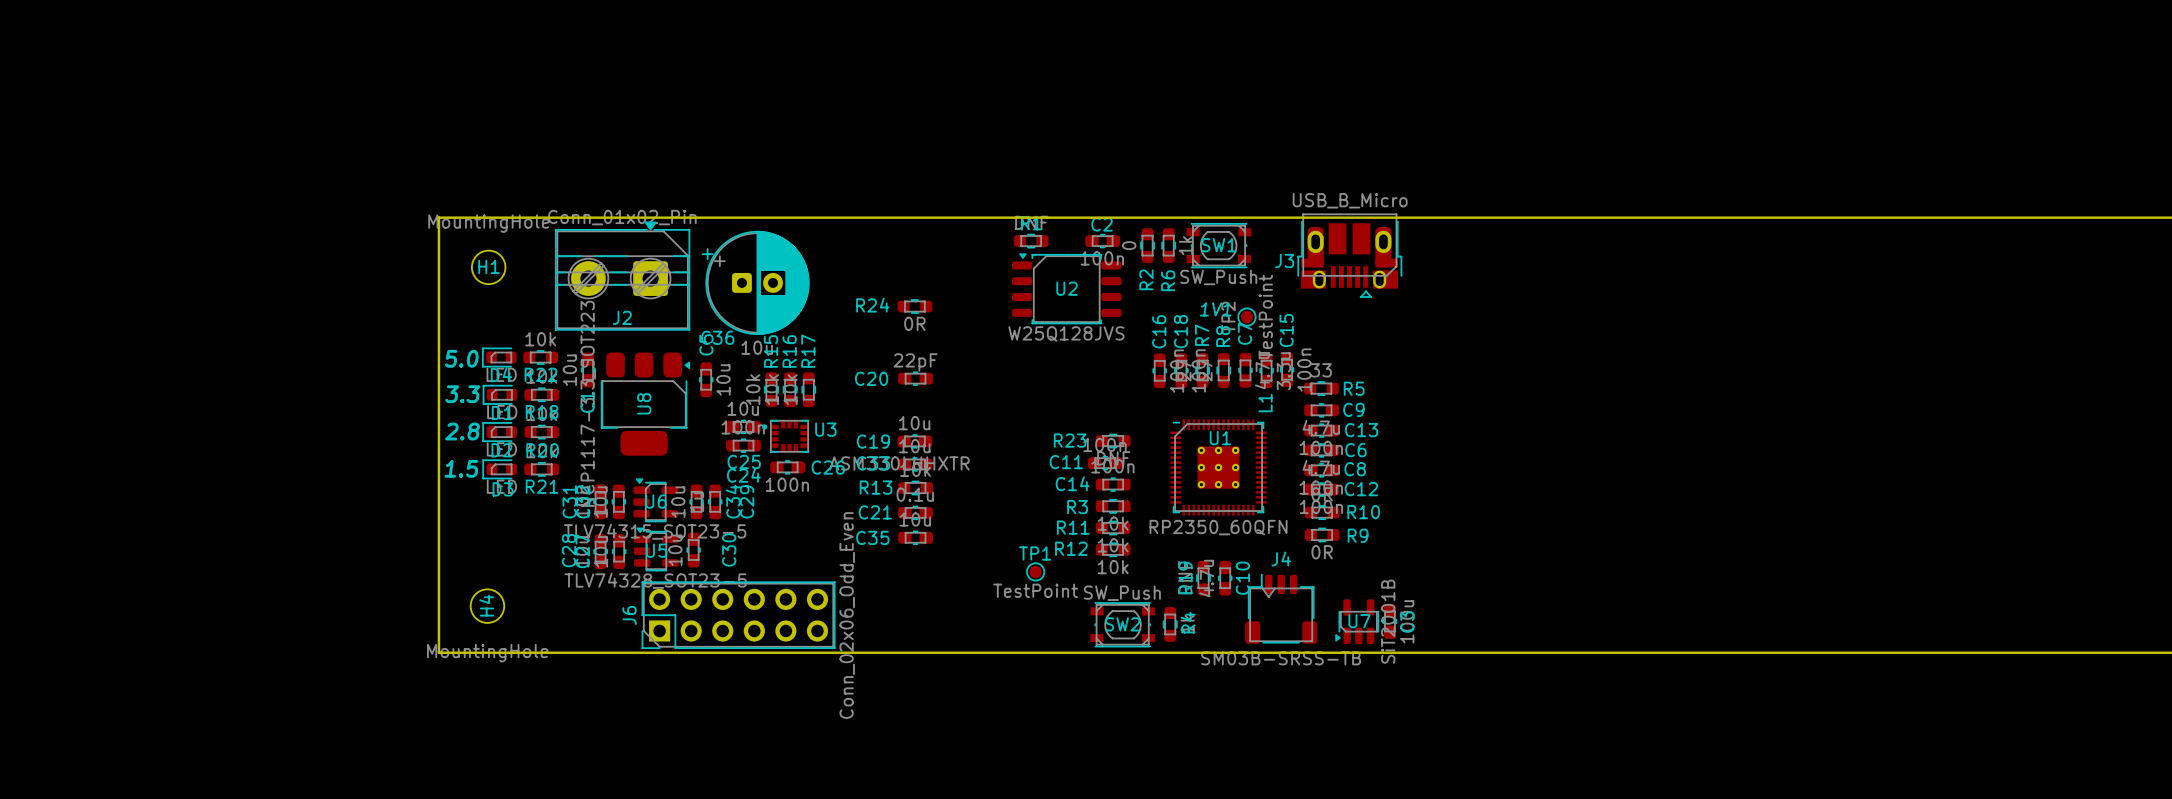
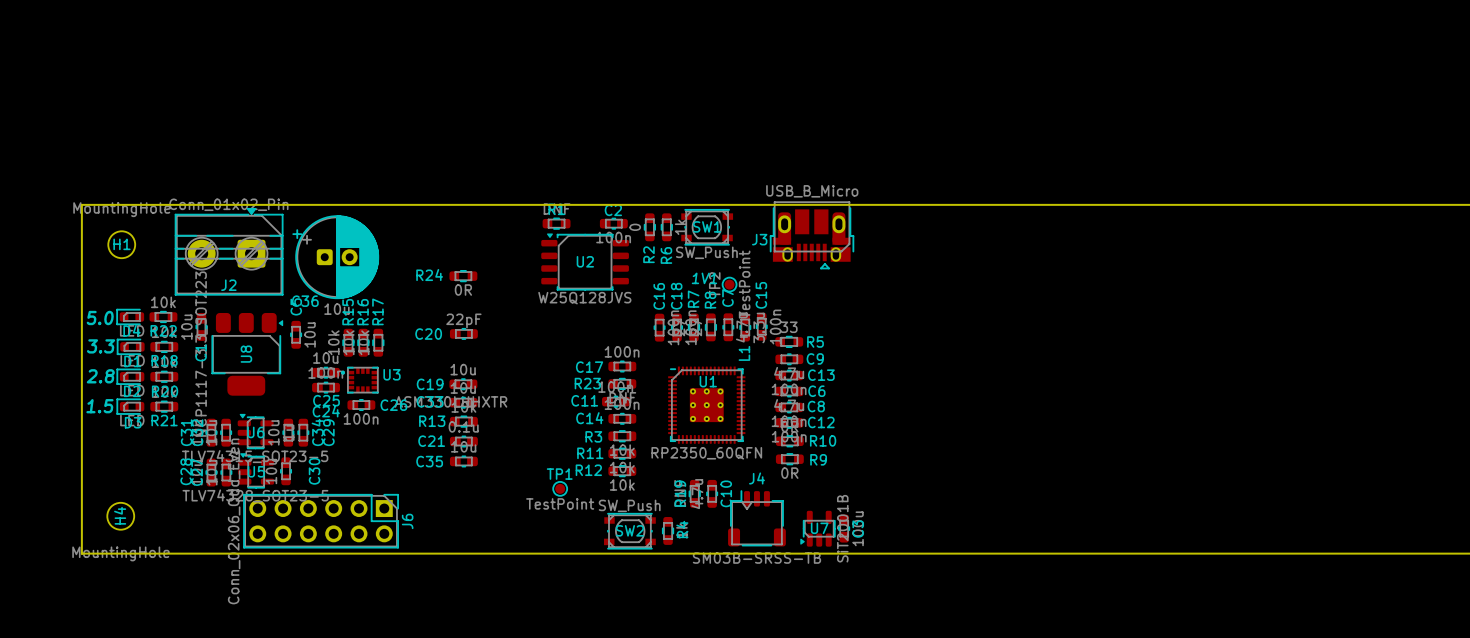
C17: none -> 100n (622, 366)
J6 rotation: 0° (738, 615) -> 180° (321, 521)

